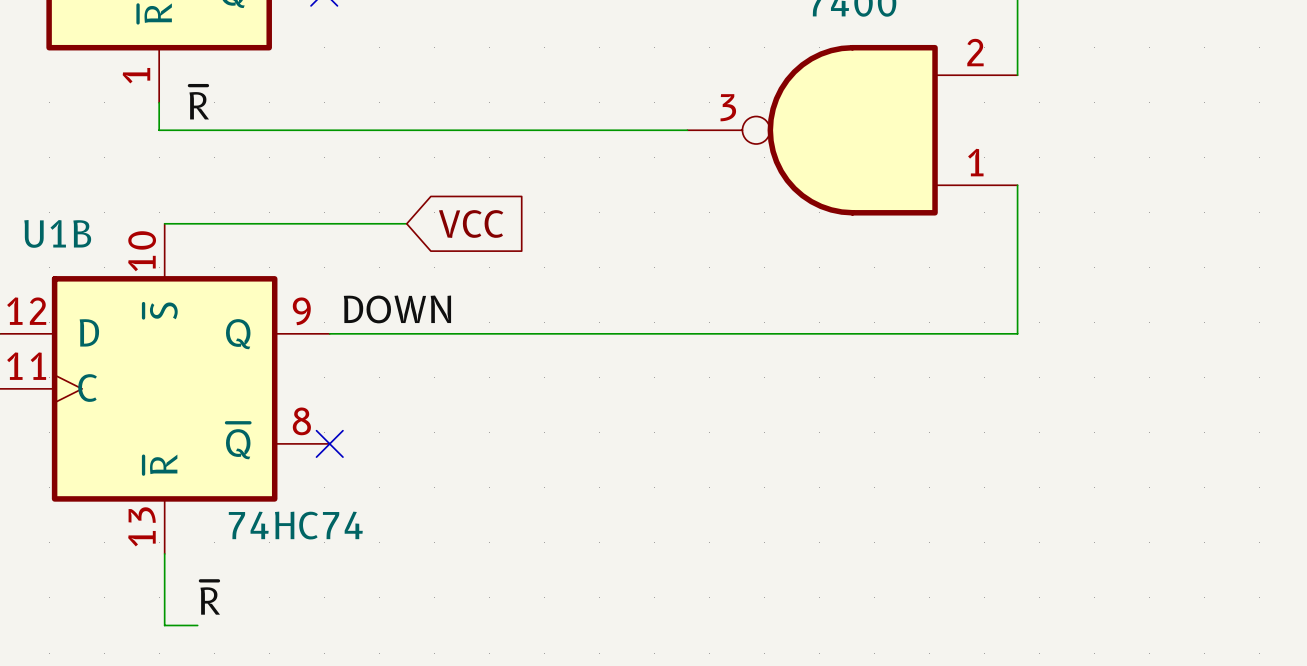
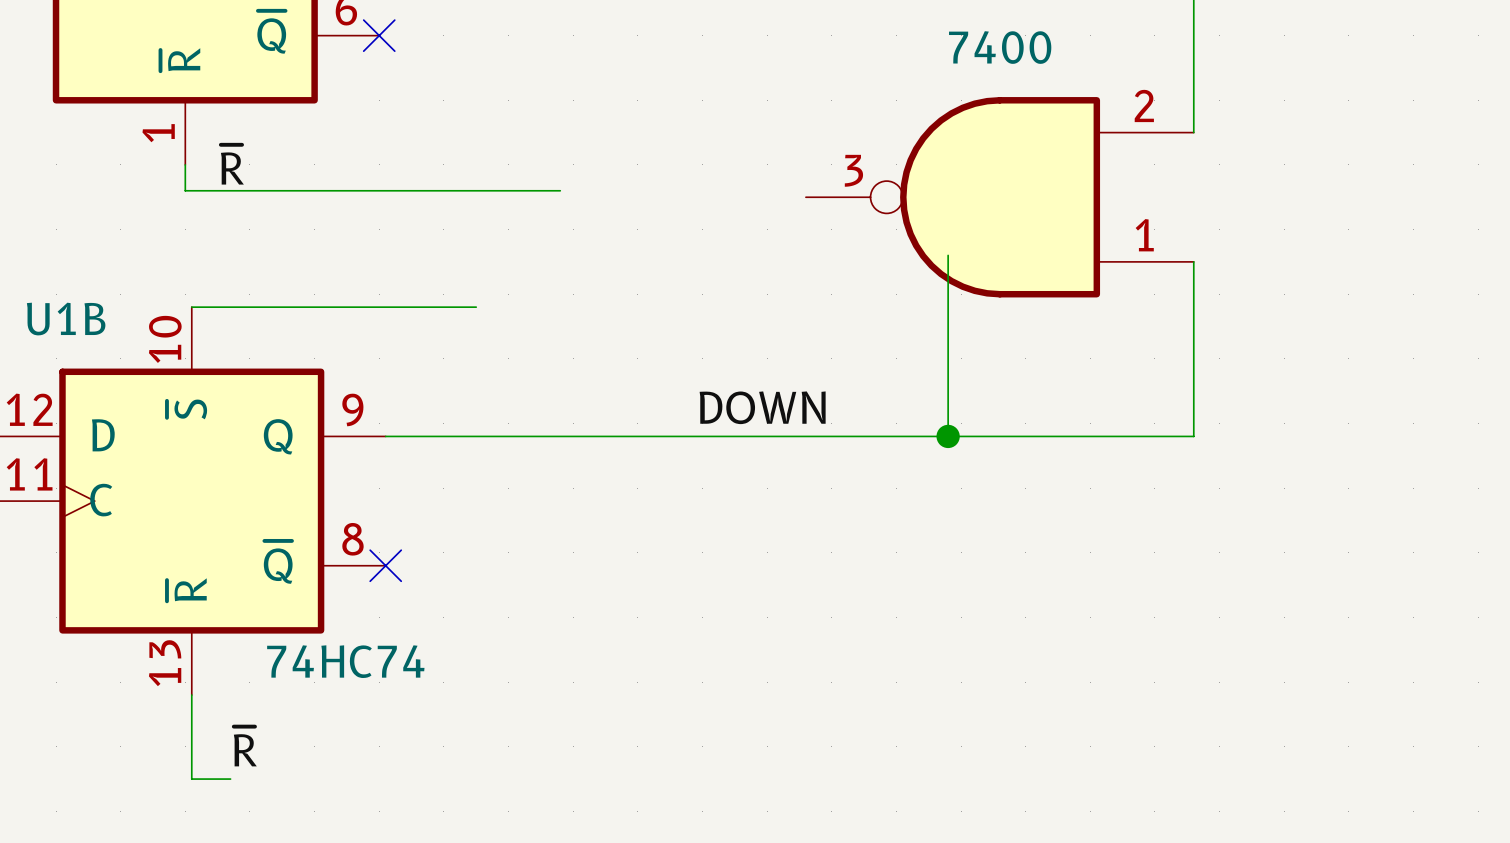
wire: (159, 124) (159, 130) (687, 130) -> (185, 190) (560, 190)
wire: none -> (948, 255) (948, 436)
global label: VCC (471, 223) -> none
label position: DOWN (397, 309) -> DOWN (762, 407)
junction: none -> (948, 436)

